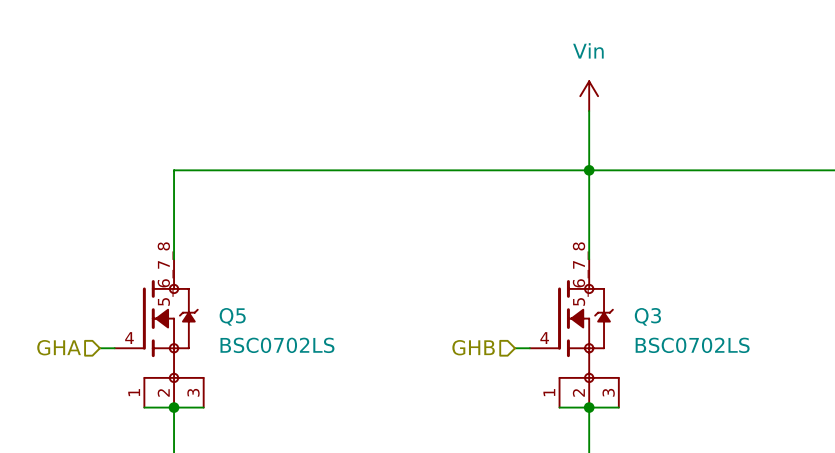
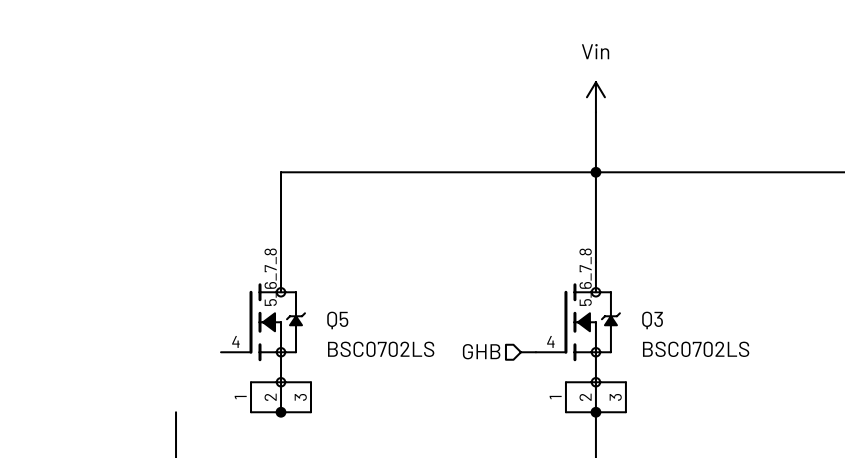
wire: (277, 170) (174, 170) (174, 259) -> (281, 172) (281, 262)
Q5 position: (159, 333) -> (266, 337)
hierarchical label: GHA (59, 347) -> none
wire: (99, 348) (114, 348) -> none
wire: (144, 407) (203, 407) -> (251, 412) (311, 412)
junction: (174, 407) -> none
junction: none -> (281, 412)

